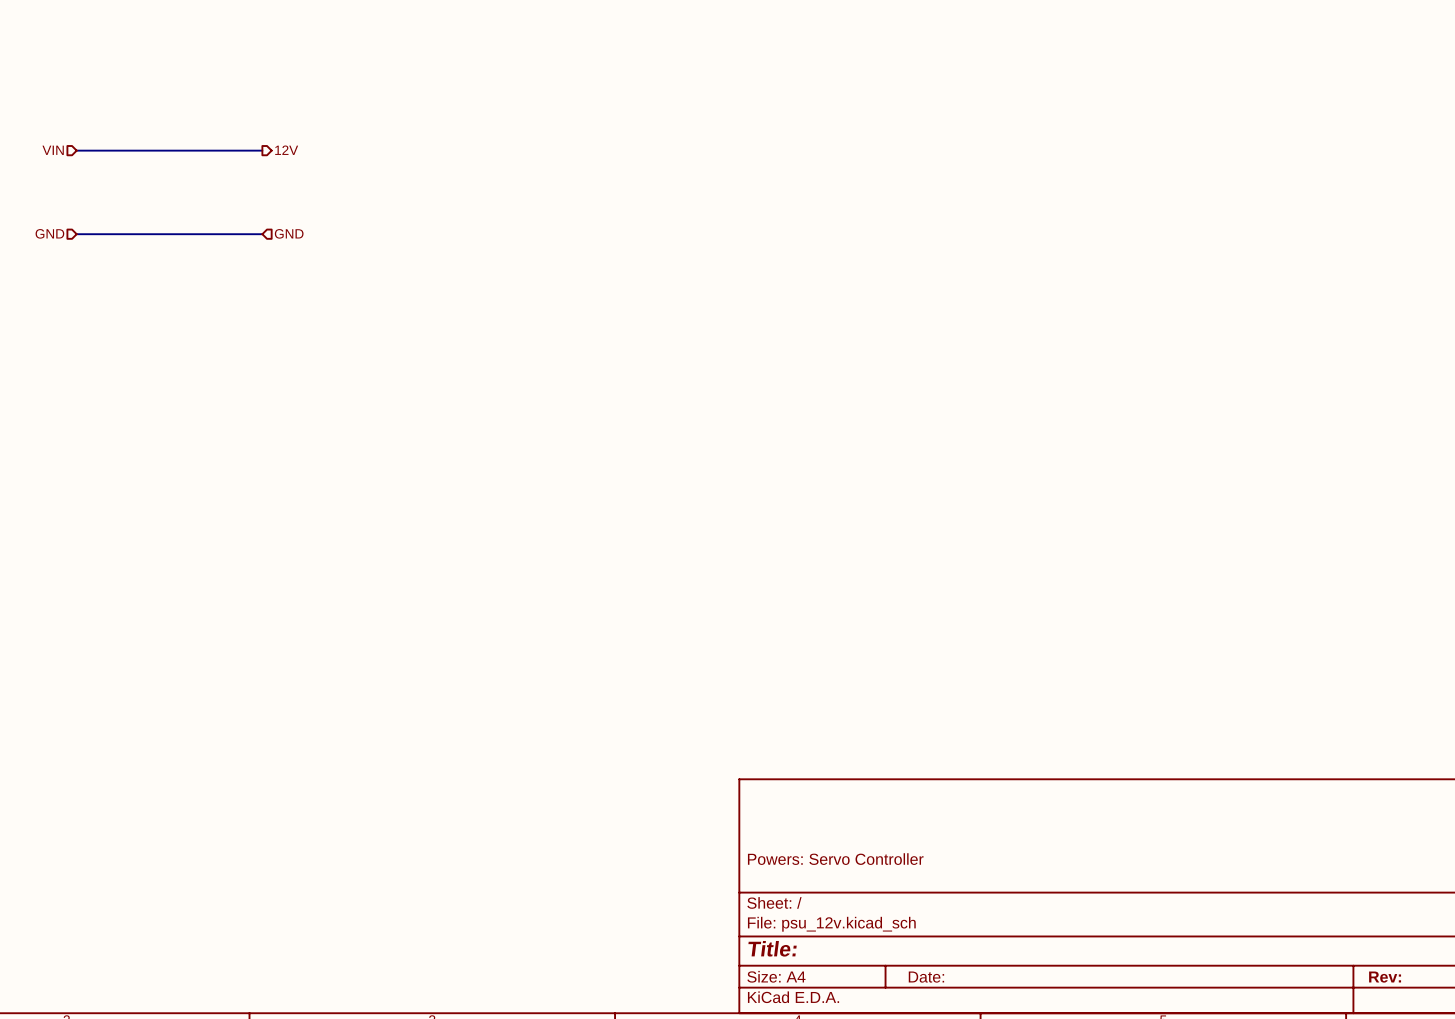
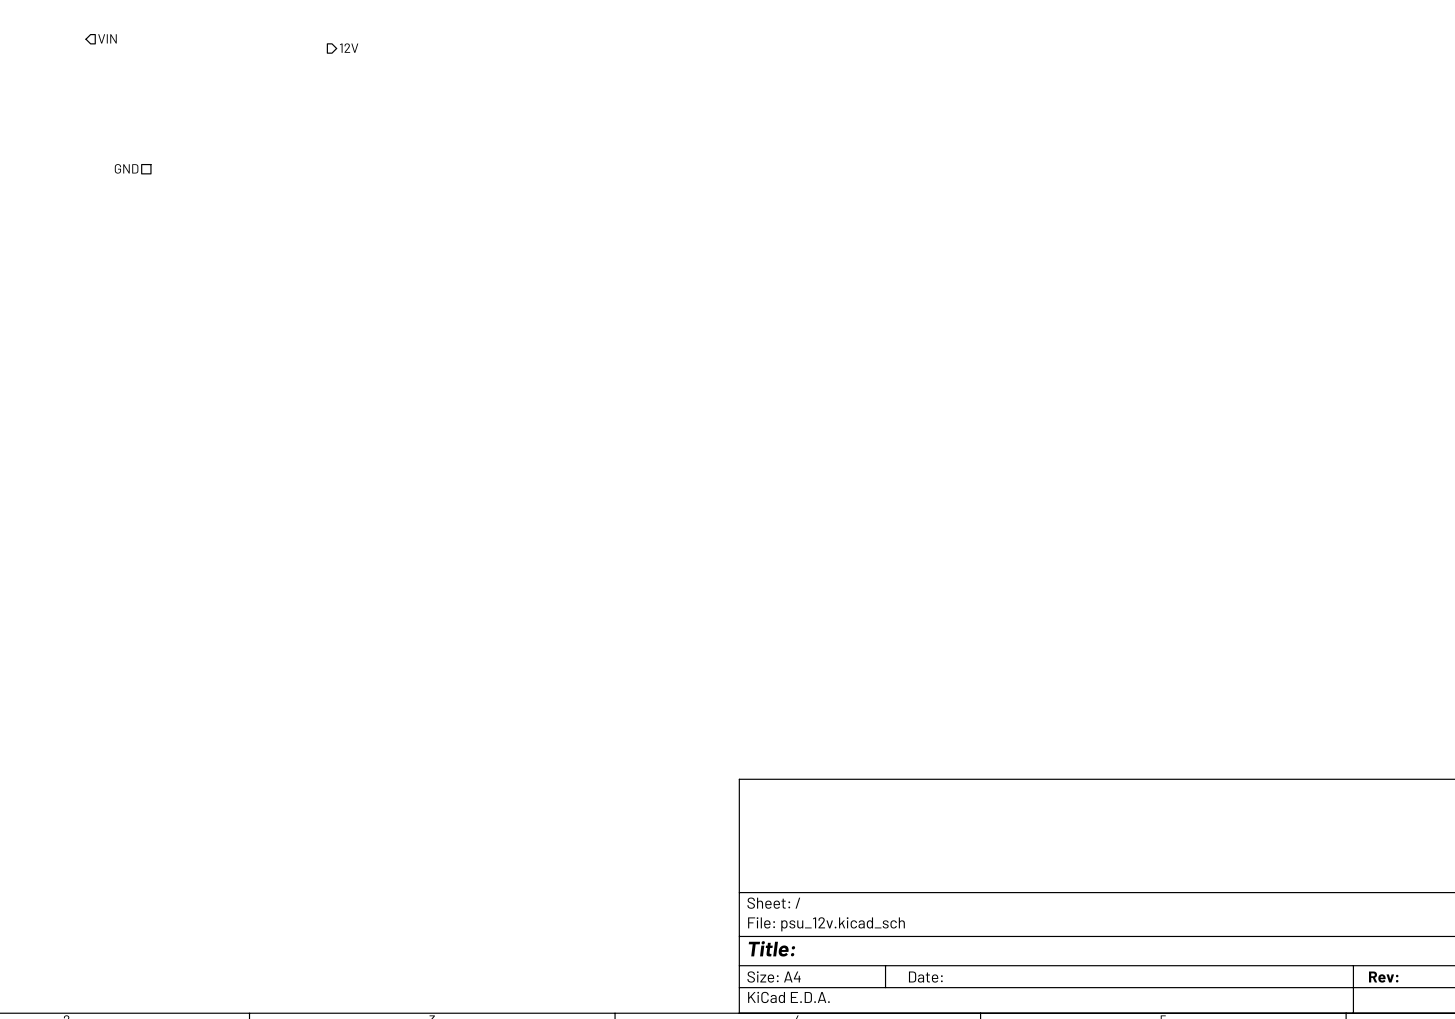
hierarchical label rotation: 0° (53, 150) -> 180° (107, 38)
hierarchical label position: VIN (53, 150) -> VIN (107, 38)
wire: (76, 150) (262, 150) -> none
hierarchical label position: 12V (286, 150) -> 12V (349, 48)
hierarchical label: none -> GND (126, 168)
hierarchical label: GND (49, 233) -> none
hierarchical label: GND (289, 233) -> none
wire: (76, 234) (262, 234) -> none
title block: Powers: Servo Controller (835, 859) -> none

